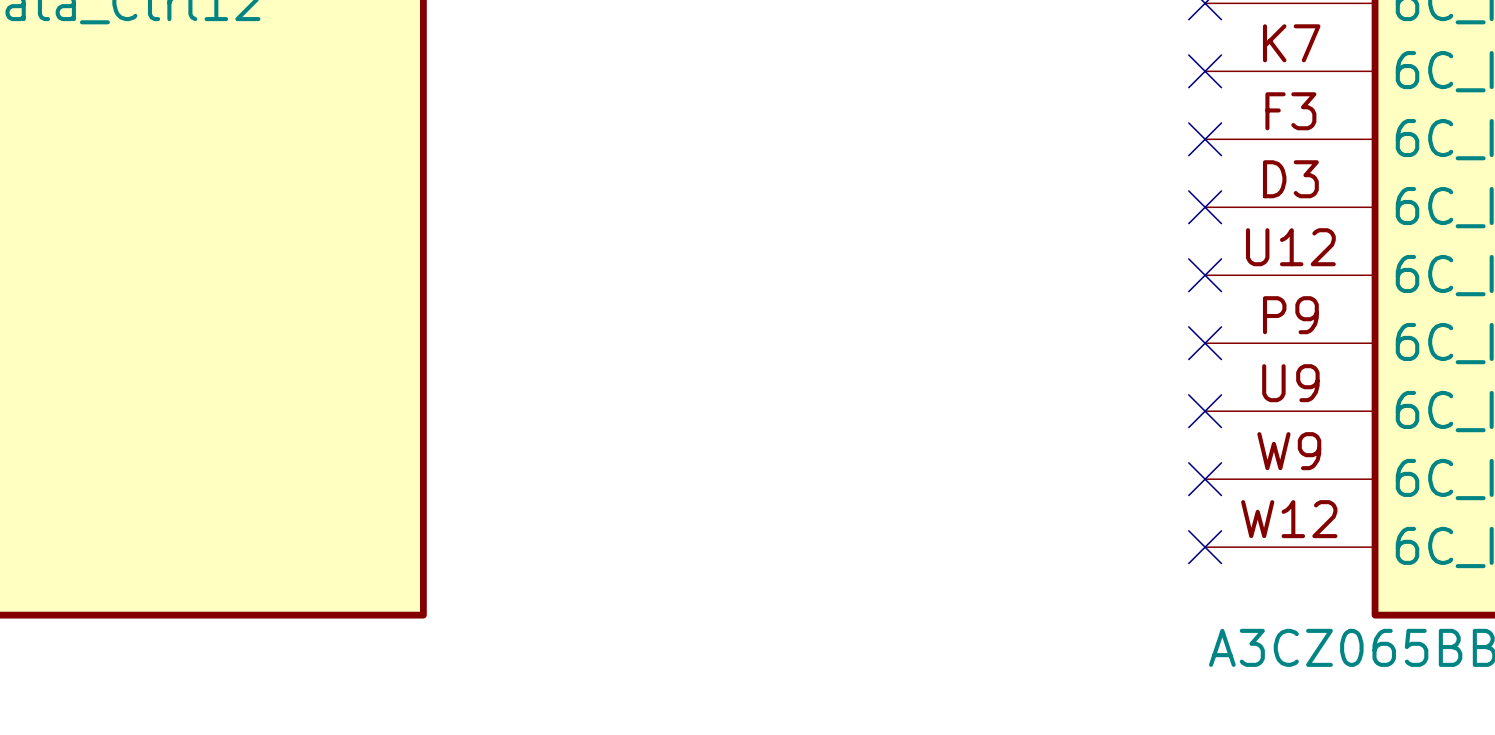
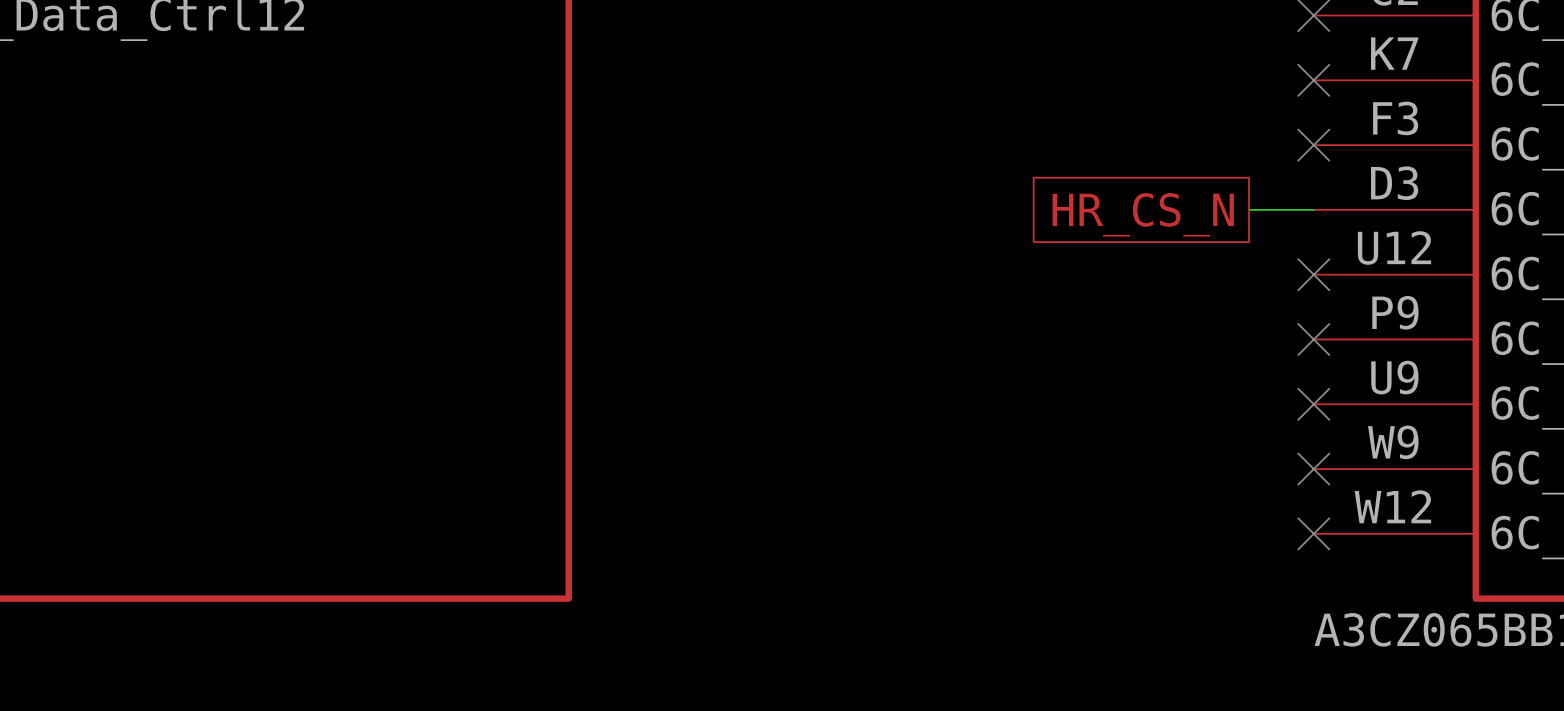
wire: none -> (1249, 209) (1313, 209)
no-connect mark: (1205, 207) -> none
global label: none -> HR_CS_N (1143, 214)

